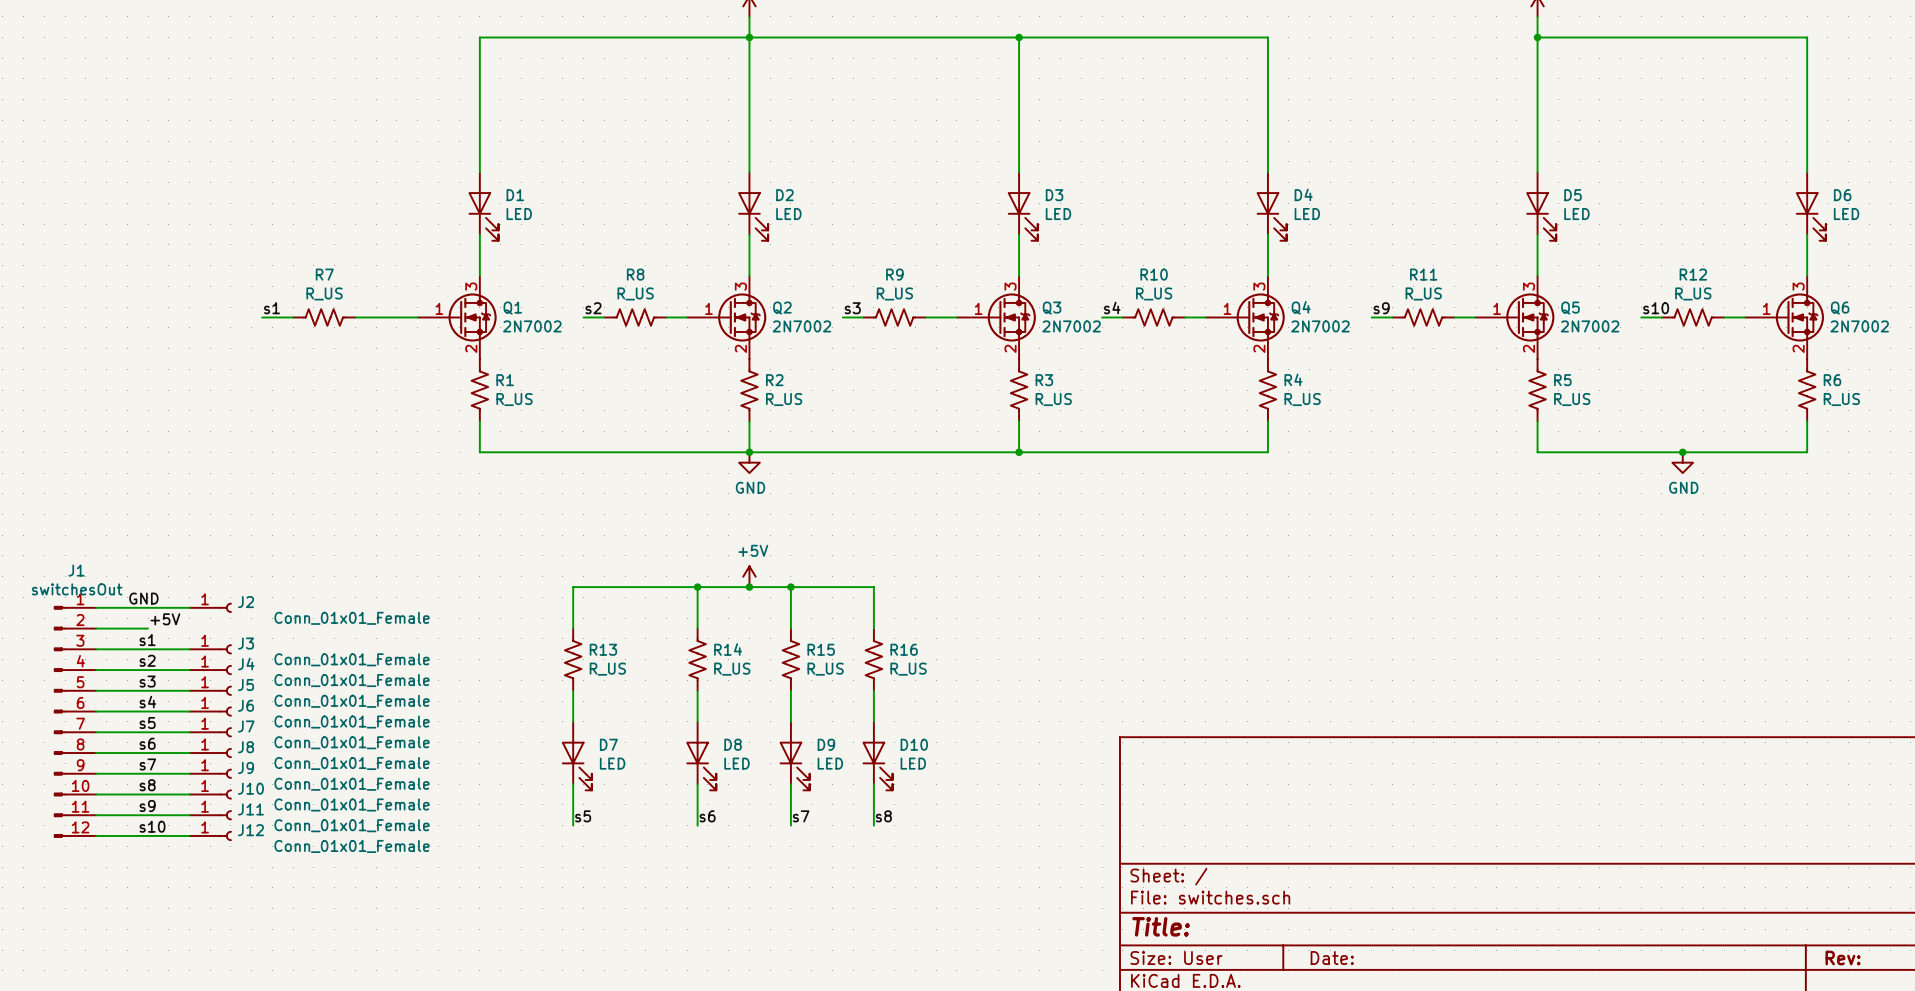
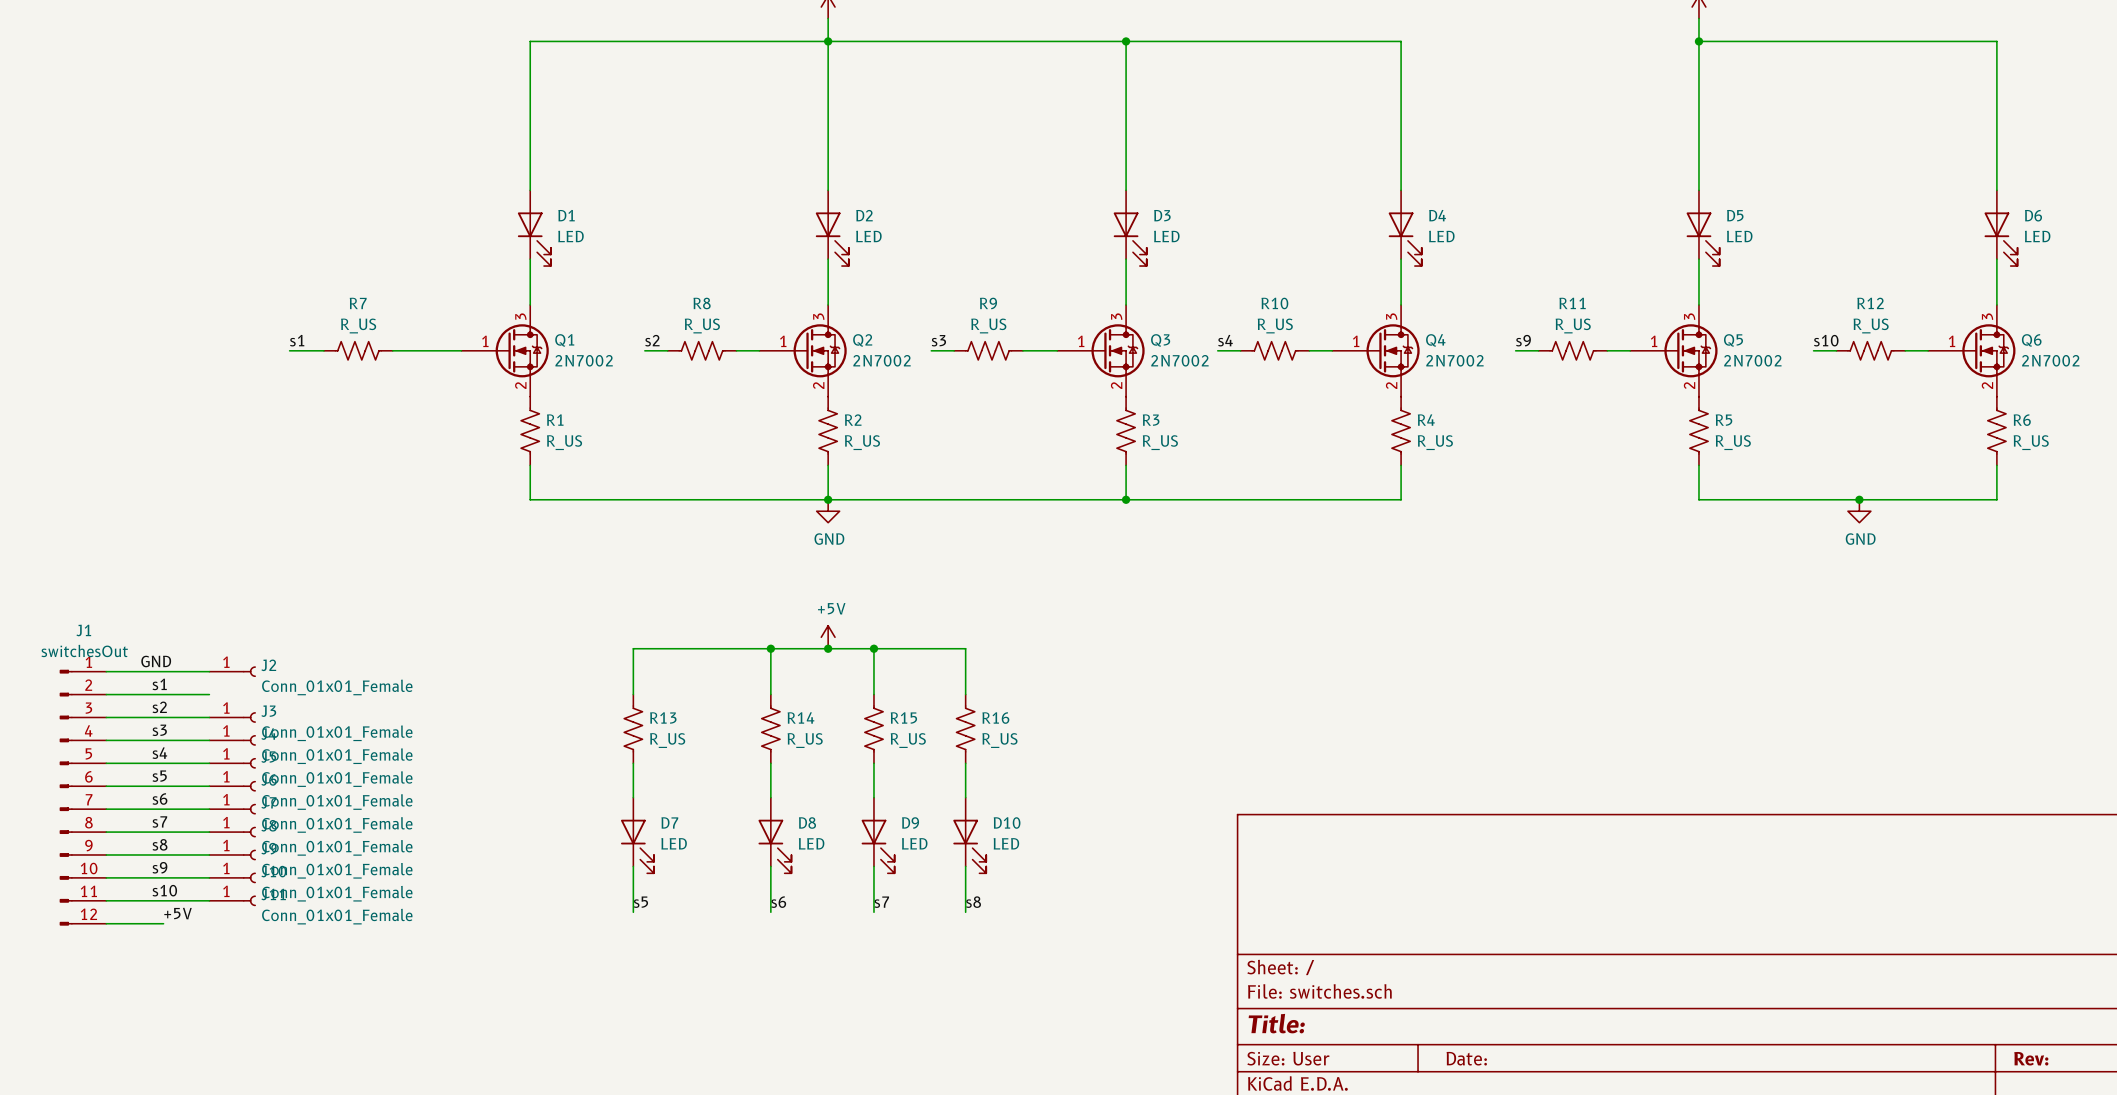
J2 value position: Conn_01x01_Female (352, 618) -> Conn_01x01_Female (337, 687)
label: none -> s1 (159, 684)
label: +5V (165, 619) -> none
wire: none -> (163, 694) (209, 694)
label: s1 (147, 640) -> s2 (159, 707)
J3 value position: Conn_01x01_Female (352, 659) -> Conn_01x01_Female (337, 733)
label: s2 (147, 660) -> s3 (159, 730)
J4 value position: Conn_01x01_Female (352, 680) -> Conn_01x01_Female (337, 756)
label: s3 (147, 681) -> s4 (159, 753)
J5 value position: Conn_01x01_Female (352, 701) -> Conn_01x01_Female (337, 779)
label: s4 (147, 702) -> s5 (159, 776)
J6 value position: Conn_01x01_Female (352, 722) -> Conn_01x01_Female (337, 802)
label: s5 (147, 723) -> s6 (159, 799)
J7 value position: Conn_01x01_Female (352, 742) -> Conn_01x01_Female (337, 824)
label: s6 (147, 743) -> s7 (159, 821)
J8 value position: Conn_01x01_Female (352, 763) -> Conn_01x01_Female (337, 847)
label: s7 (147, 764) -> s8 (160, 844)
J9 value position: Conn_01x01_Female (352, 784) -> Conn_01x01_Female (337, 870)
label: s8 (147, 785) -> s9 (159, 867)
J10 value position: Conn_01x01_Female (352, 804) -> Conn_01x01_Female (337, 893)
label: s9 (147, 805) -> s10 (164, 890)
J11 value position: Conn_01x01_Female (352, 825) -> Conn_01x01_Female (337, 916)
label: s10 (152, 826) -> none
label: none -> +5V (178, 913)
wire: (148, 835) (189, 835) -> none
J12: Conn_01x01_Female (210, 835) -> none

